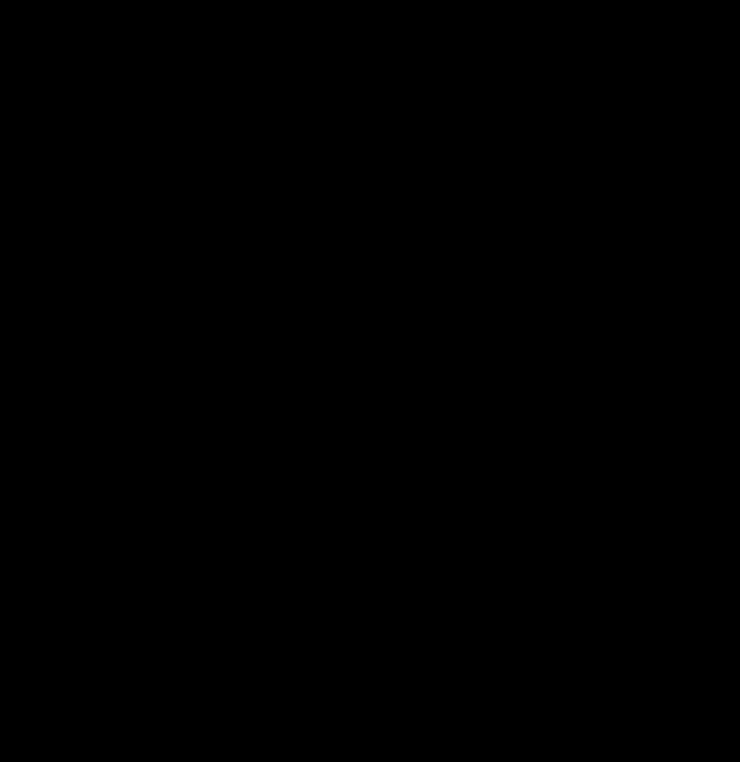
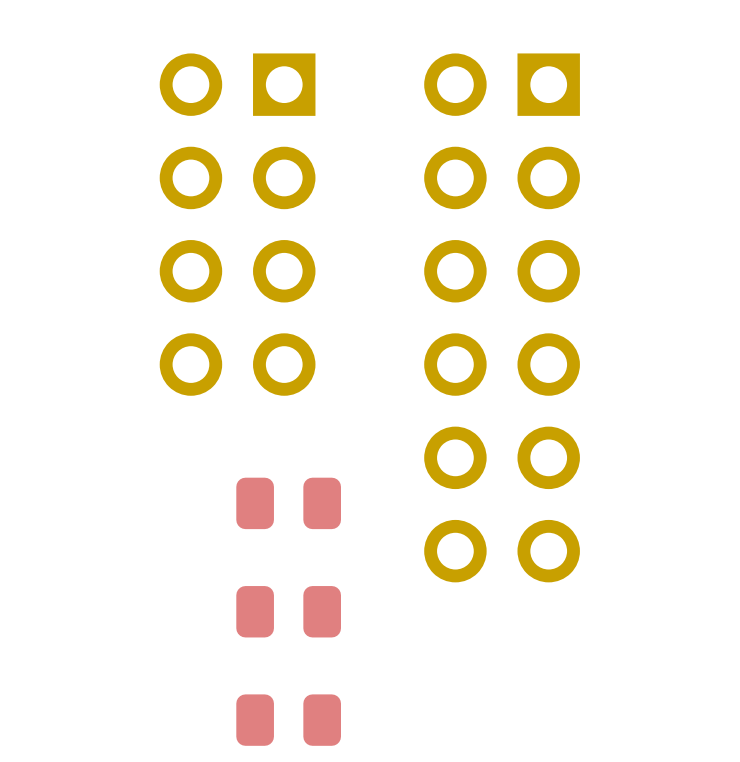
part: none -> (237, 224)
part: none -> (502, 317)
part: none -> (288, 503)
part: none -> (288, 611)
part: none -> (288, 720)

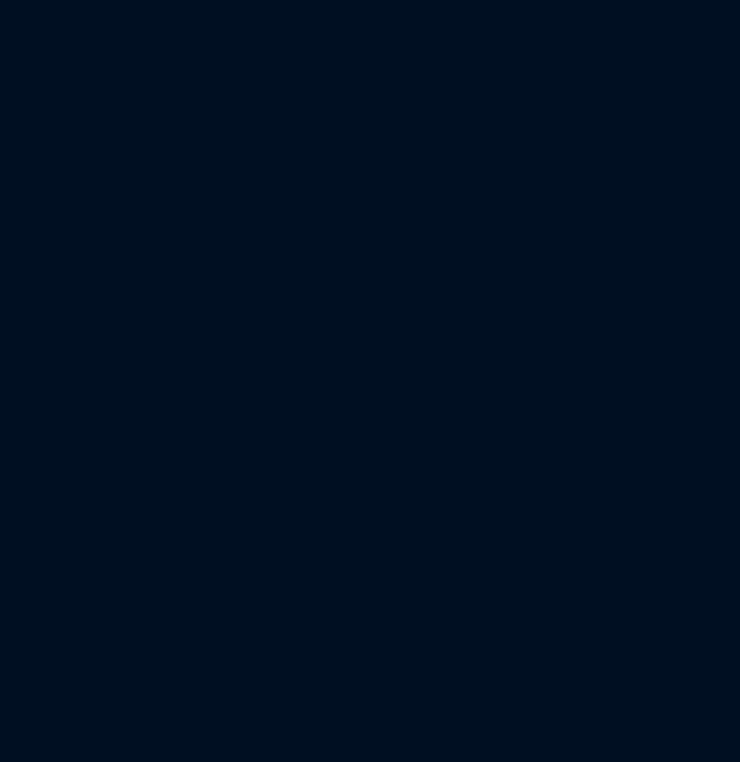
part: (237, 224) -> none
part: (502, 317) -> none
part: (288, 503) -> none
part: (288, 611) -> none
part: (288, 720) -> none

